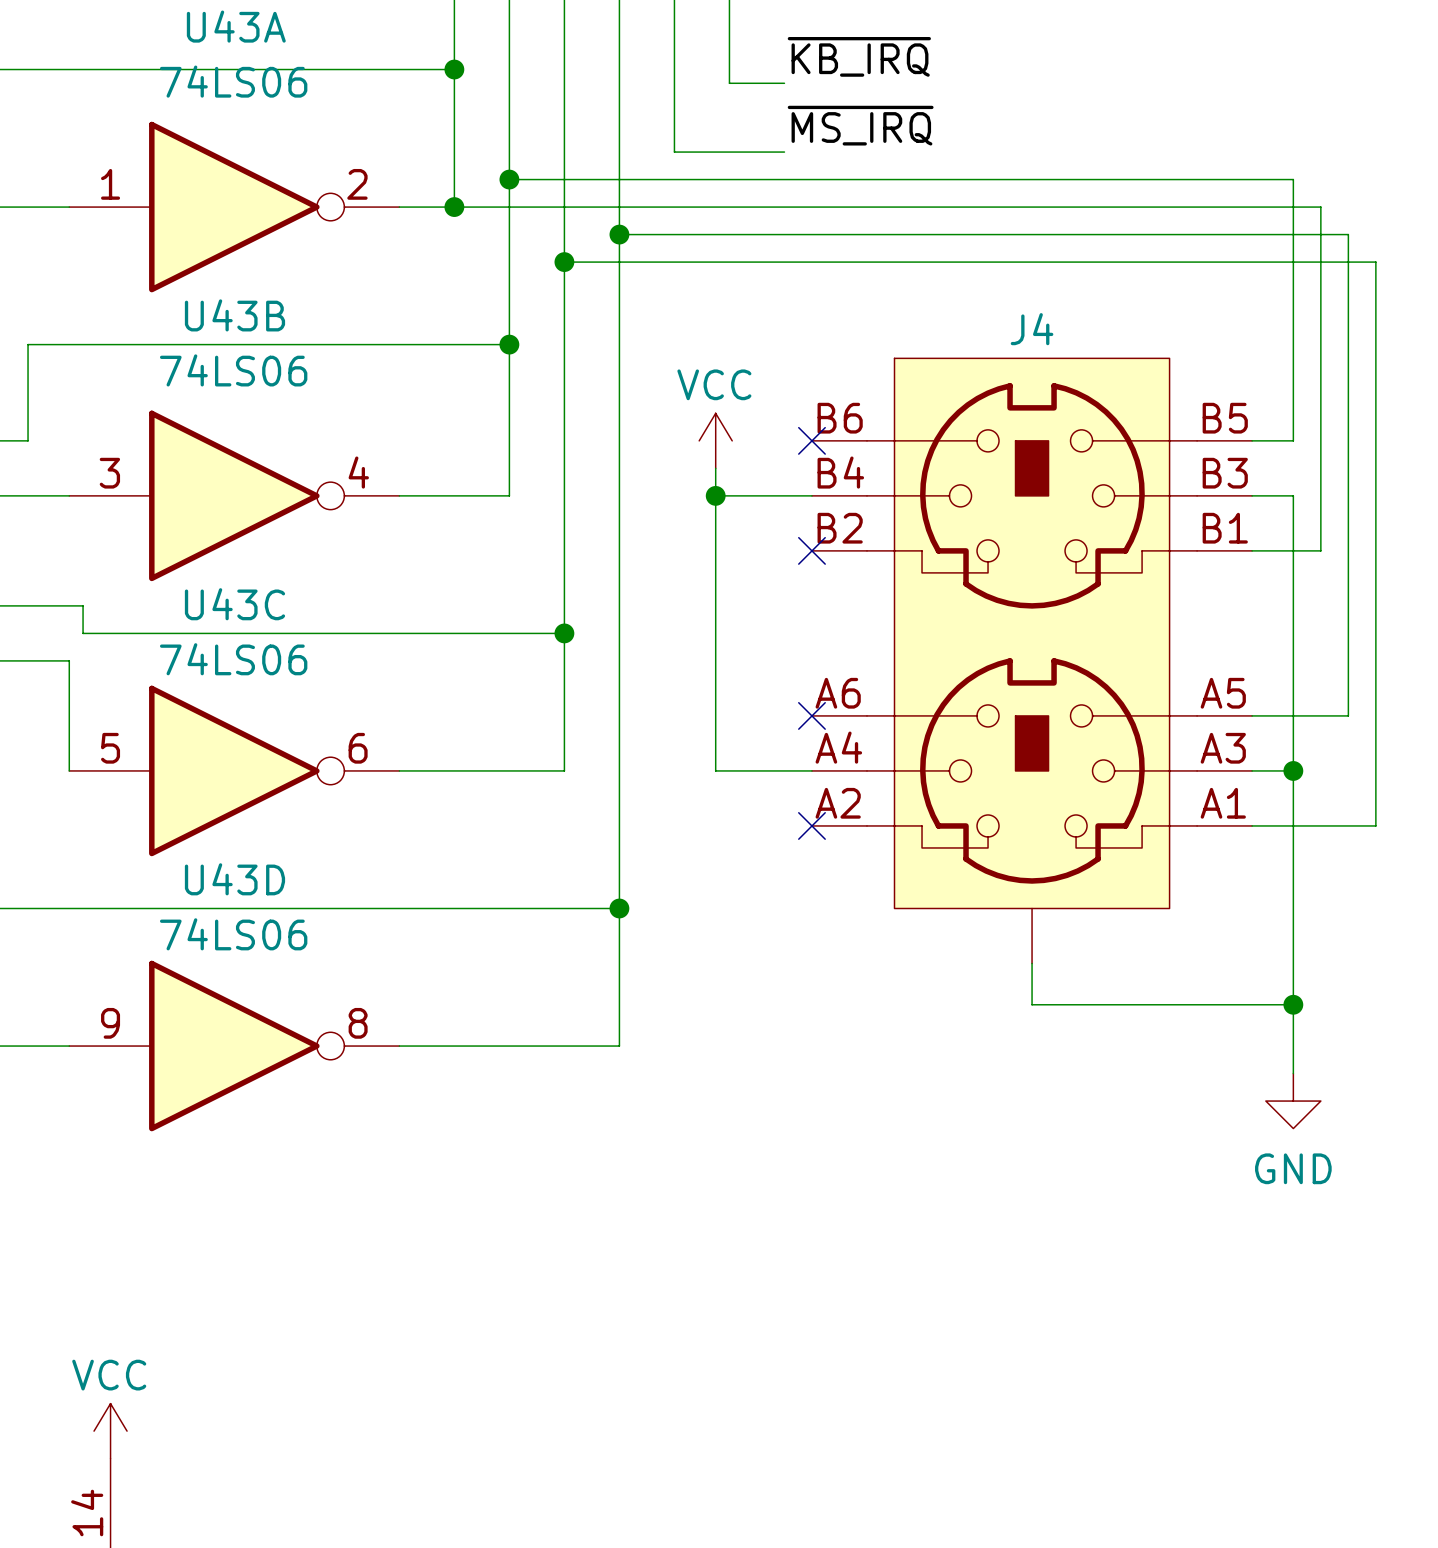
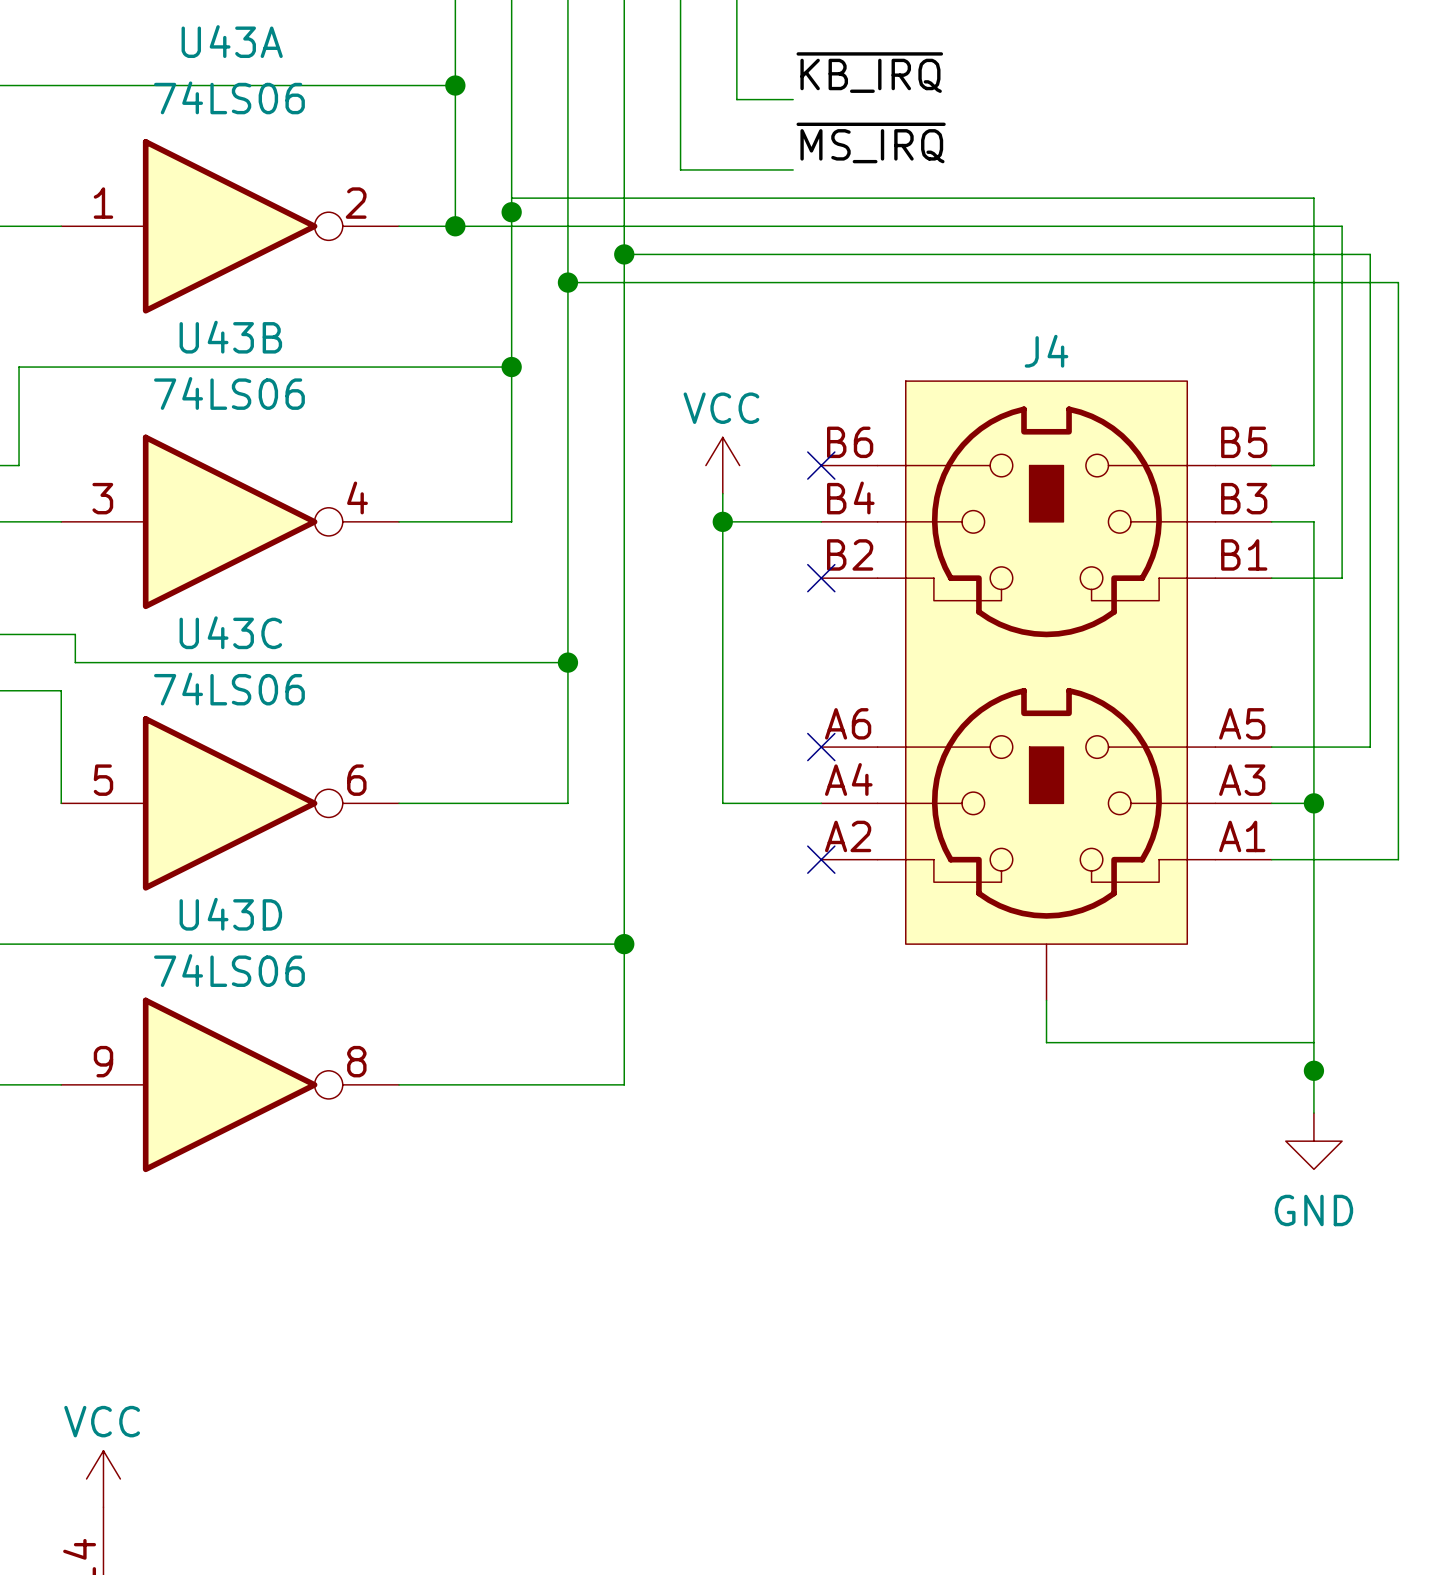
junction position: (509, 179) -> (511, 212)
junction position: (1293, 1004) -> (1313, 1070)

